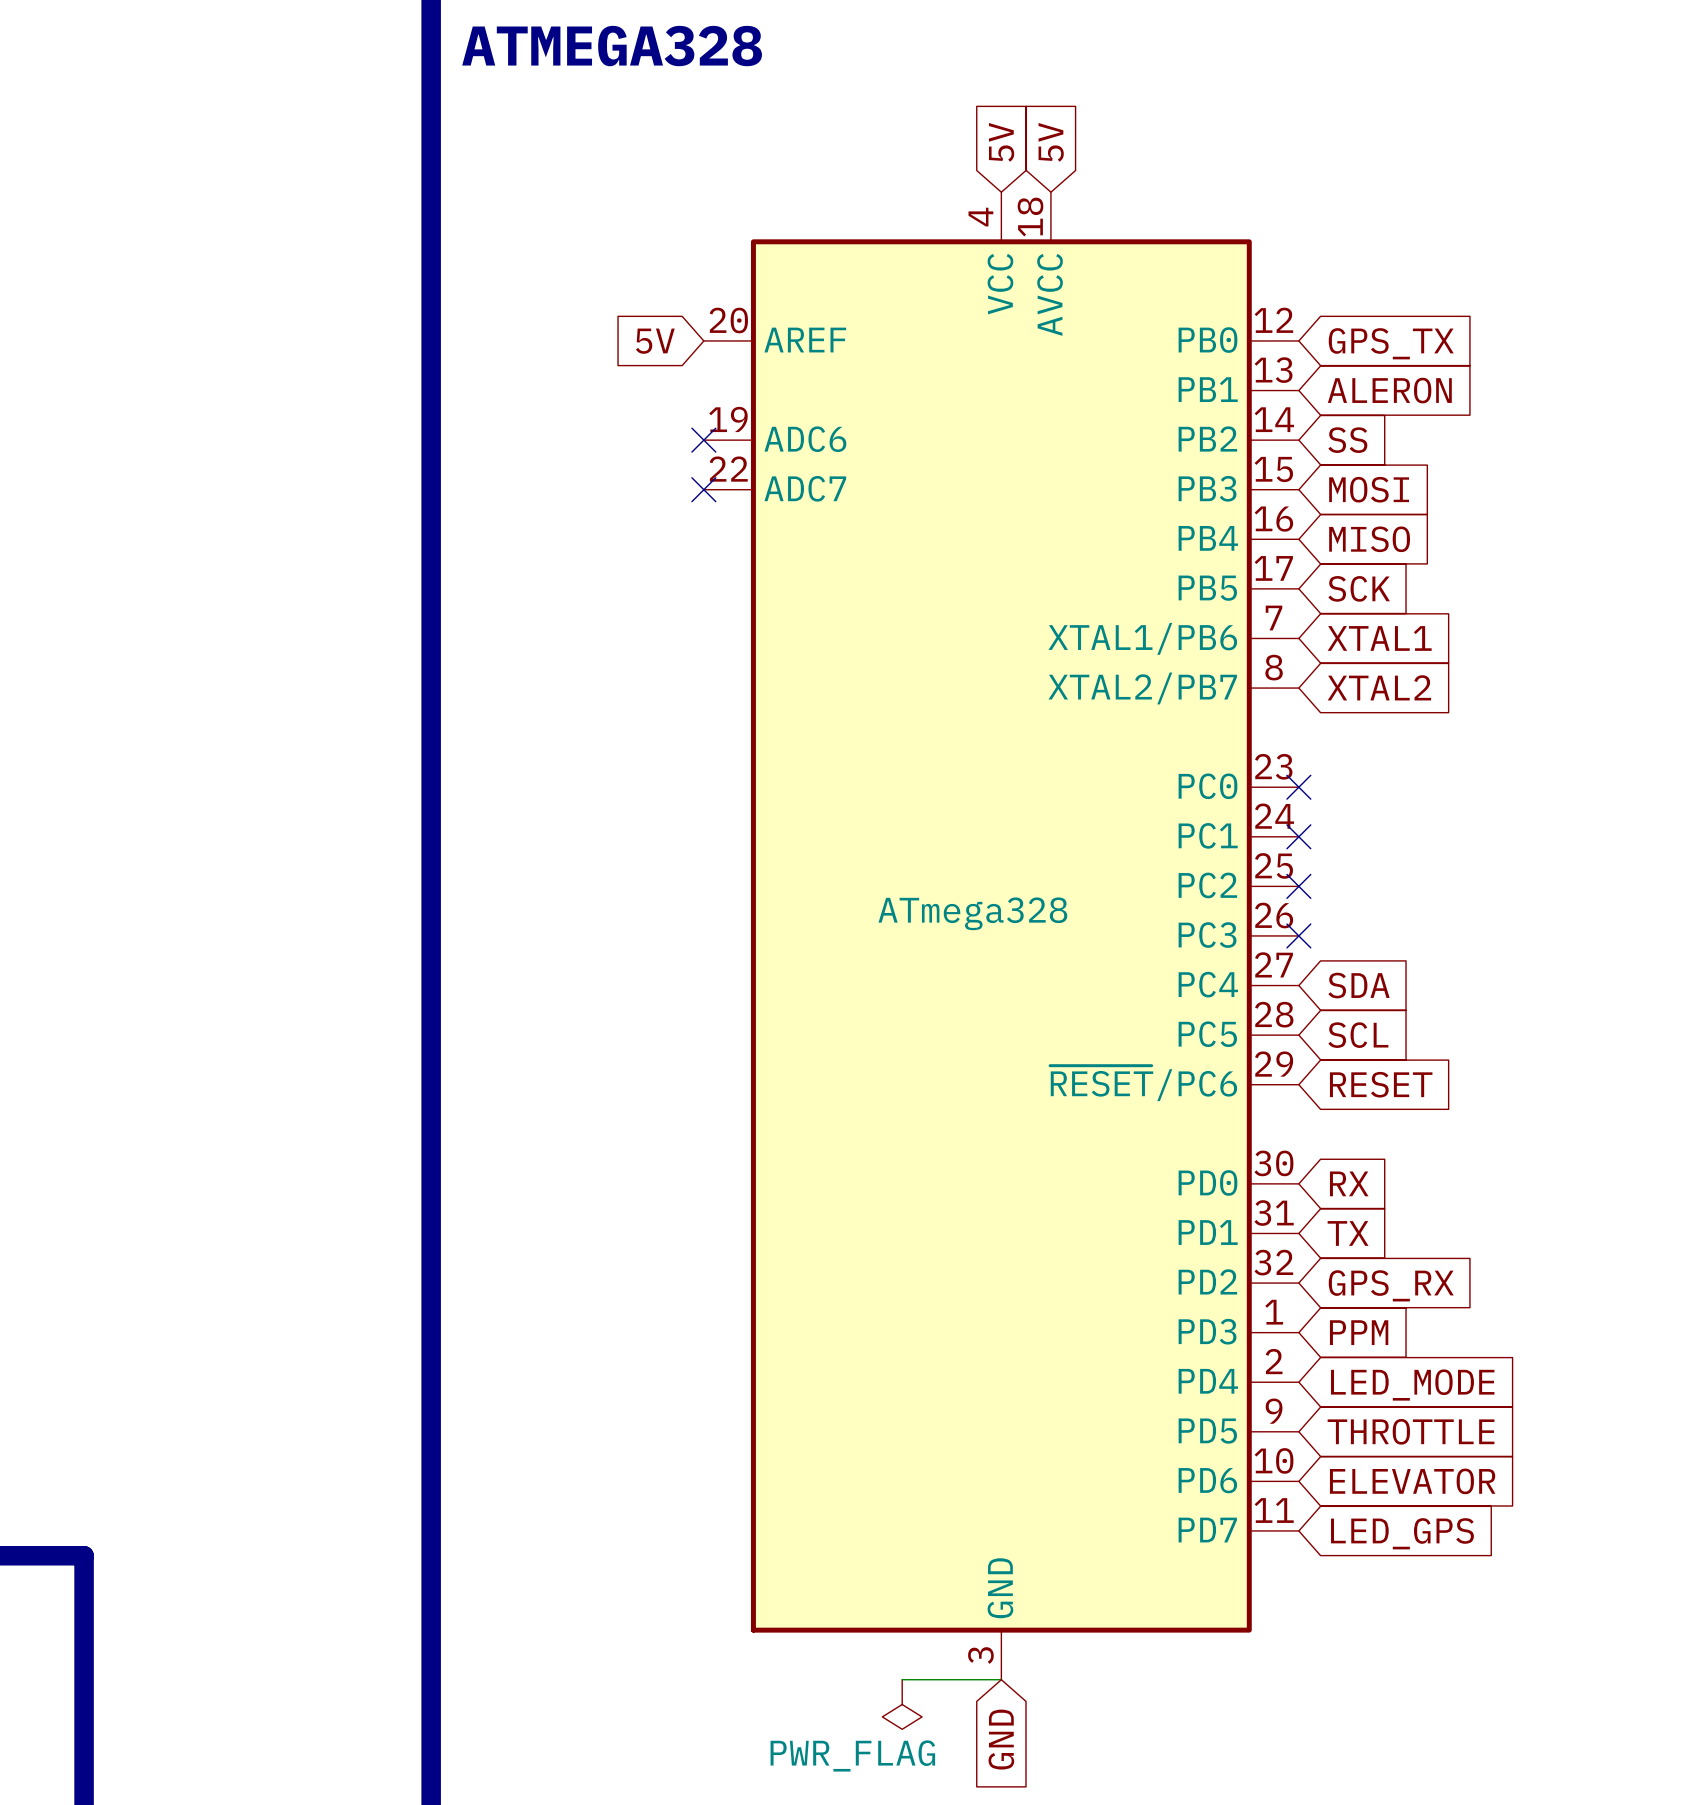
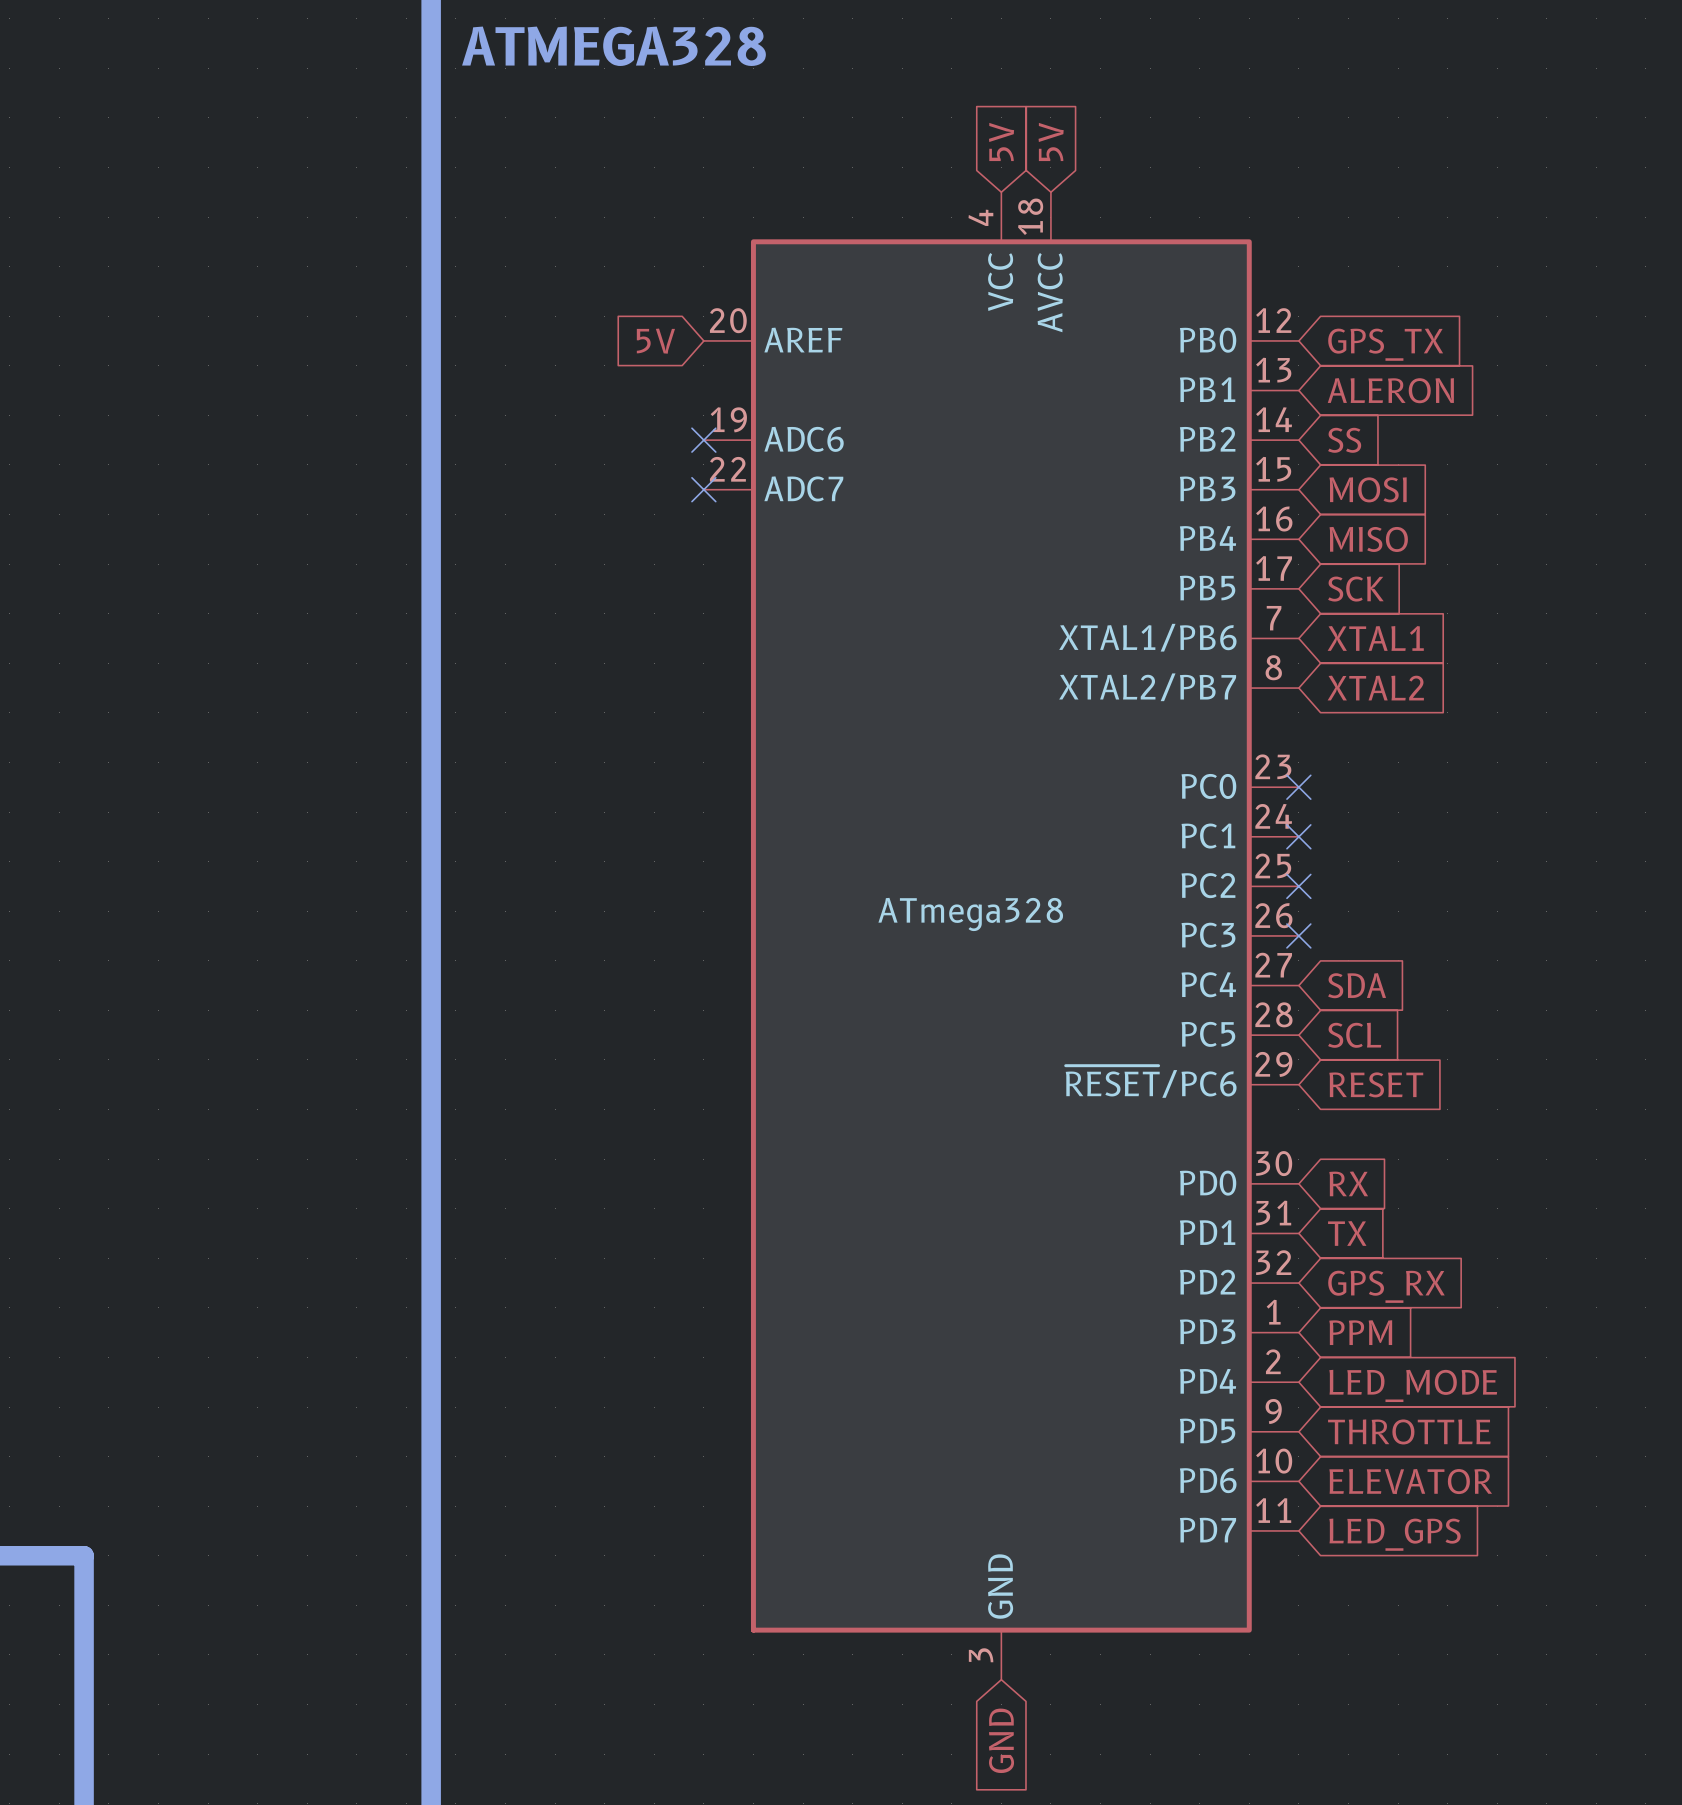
wire: (902, 1679) (1001, 1679) -> none
power symbol: PWR_FLAG (902, 1704) -> none

